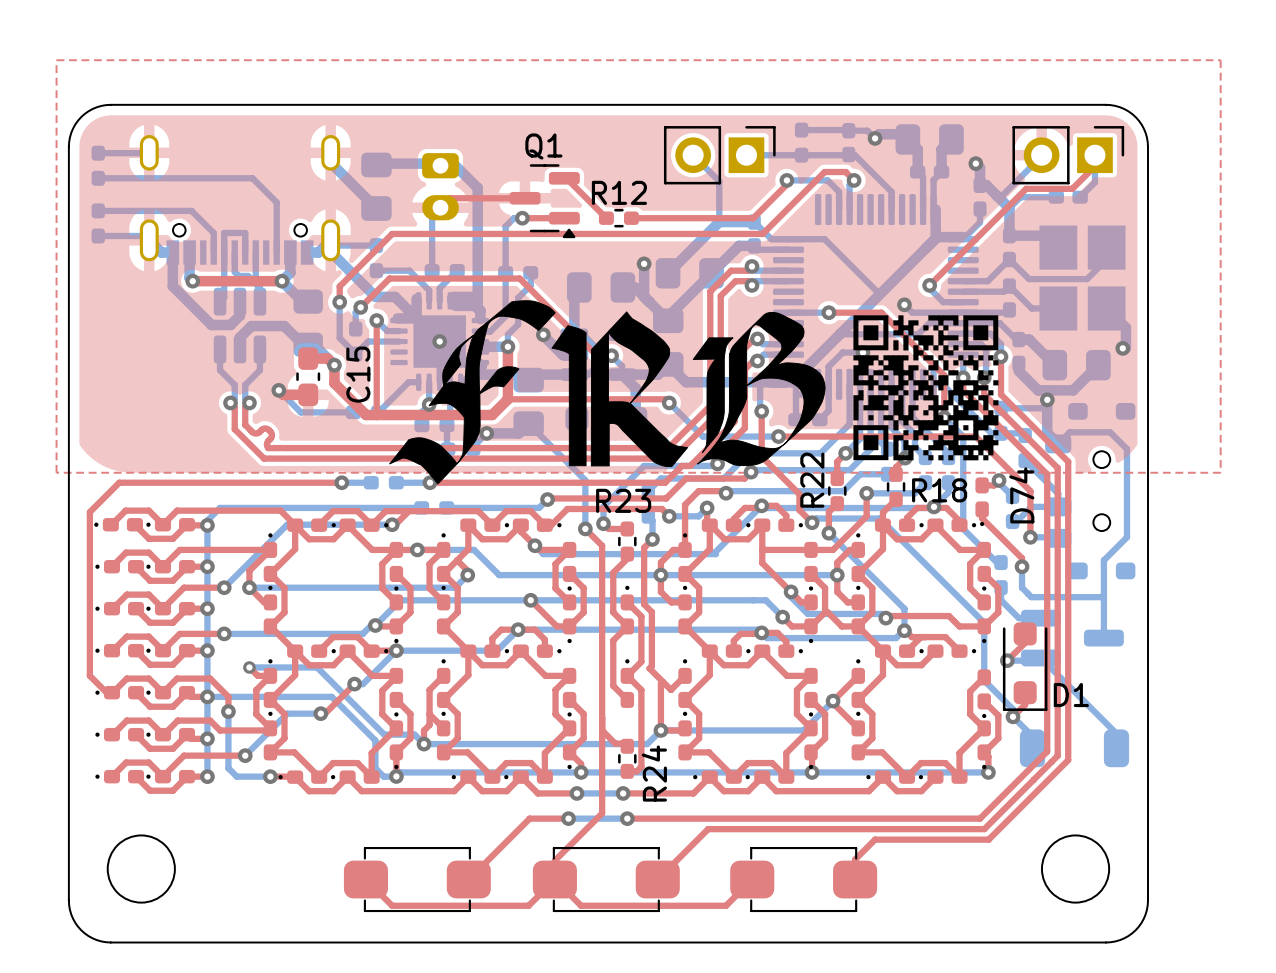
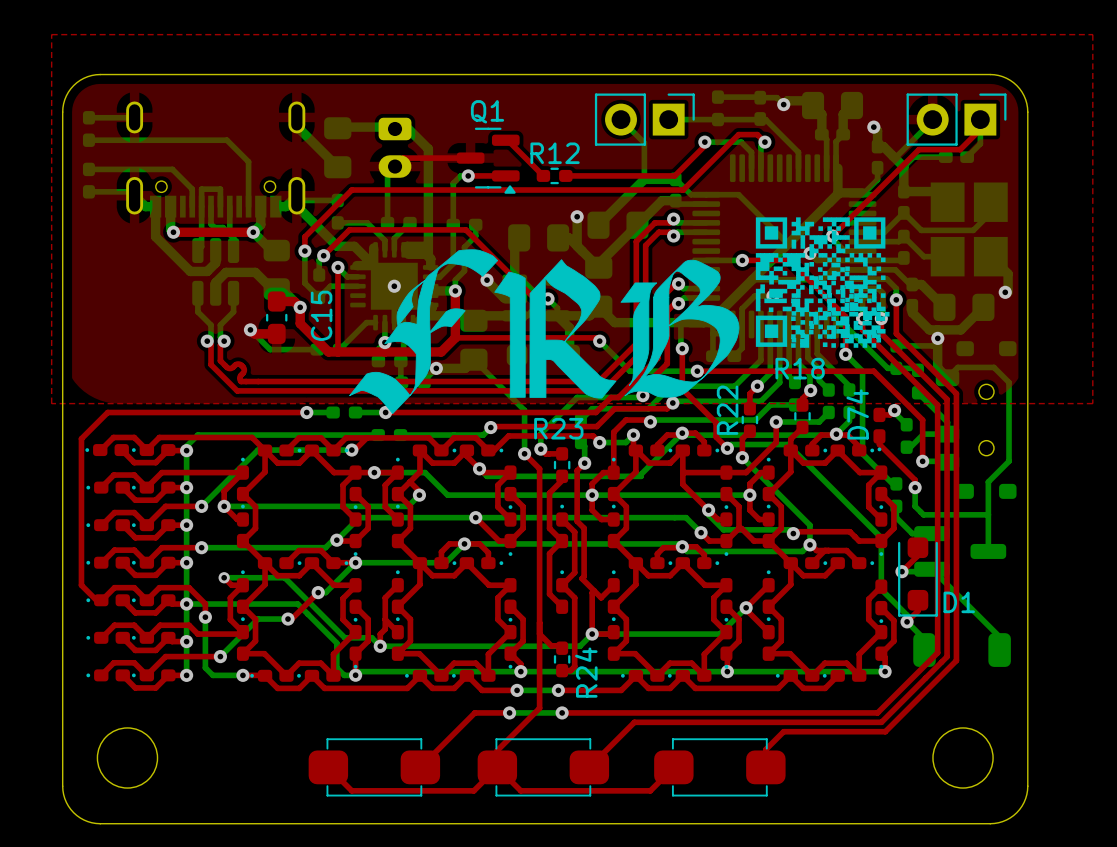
drawing: none -> [755, 217, 886, 348]
drawing: [853, 315, 999, 461] -> none
drawing position: (980, 332) -> (869, 232)
drawing position: (980, 332) -> (869, 232)
R18 name position: R18 (939, 490) -> R18 (800, 368)
D74 name position: D74 (1021, 495) -> D74 (857, 414)

